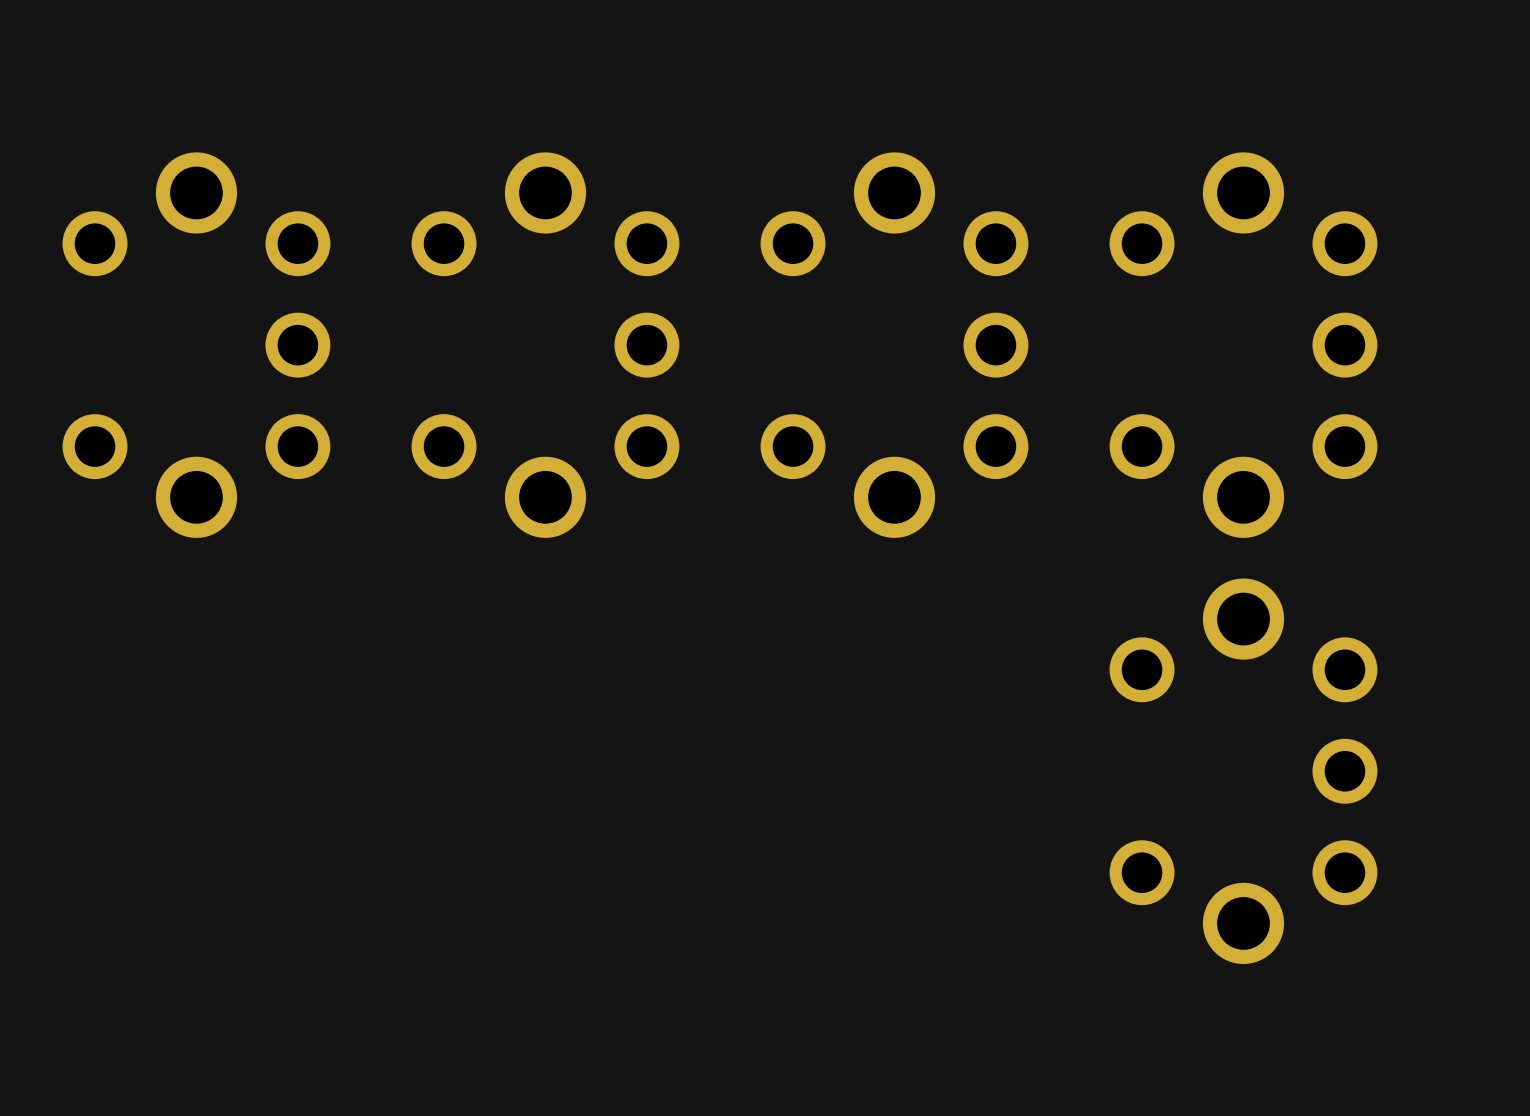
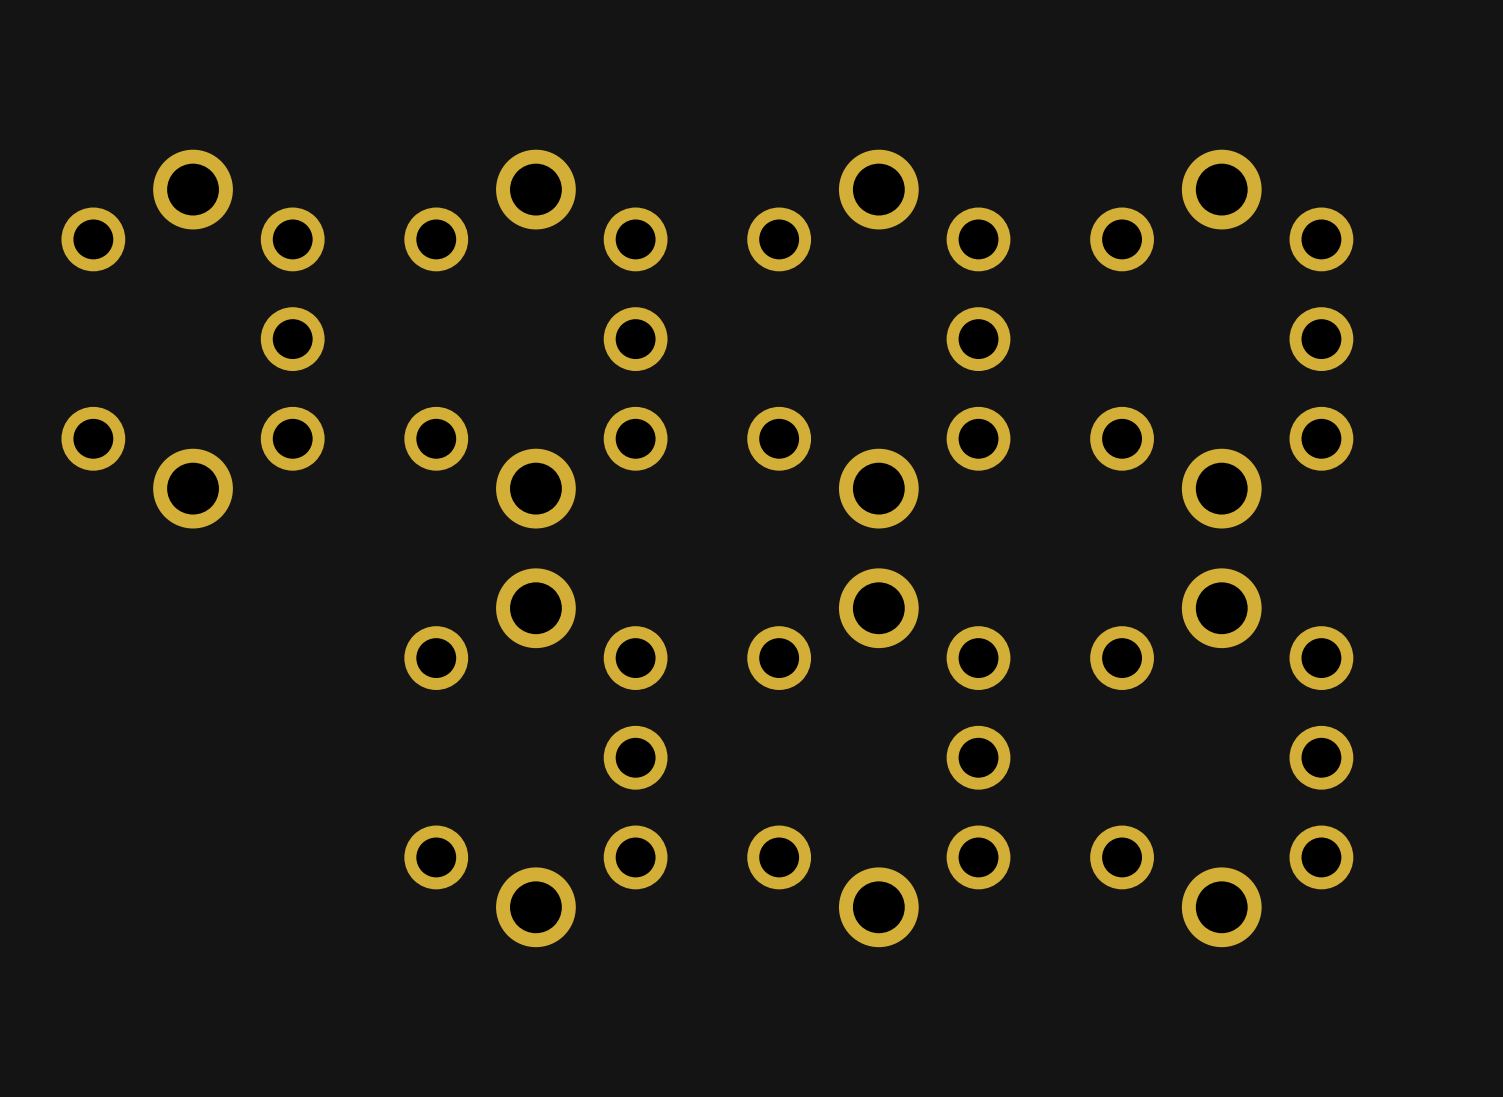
part: none -> (535, 757)
part: none -> (878, 757)

